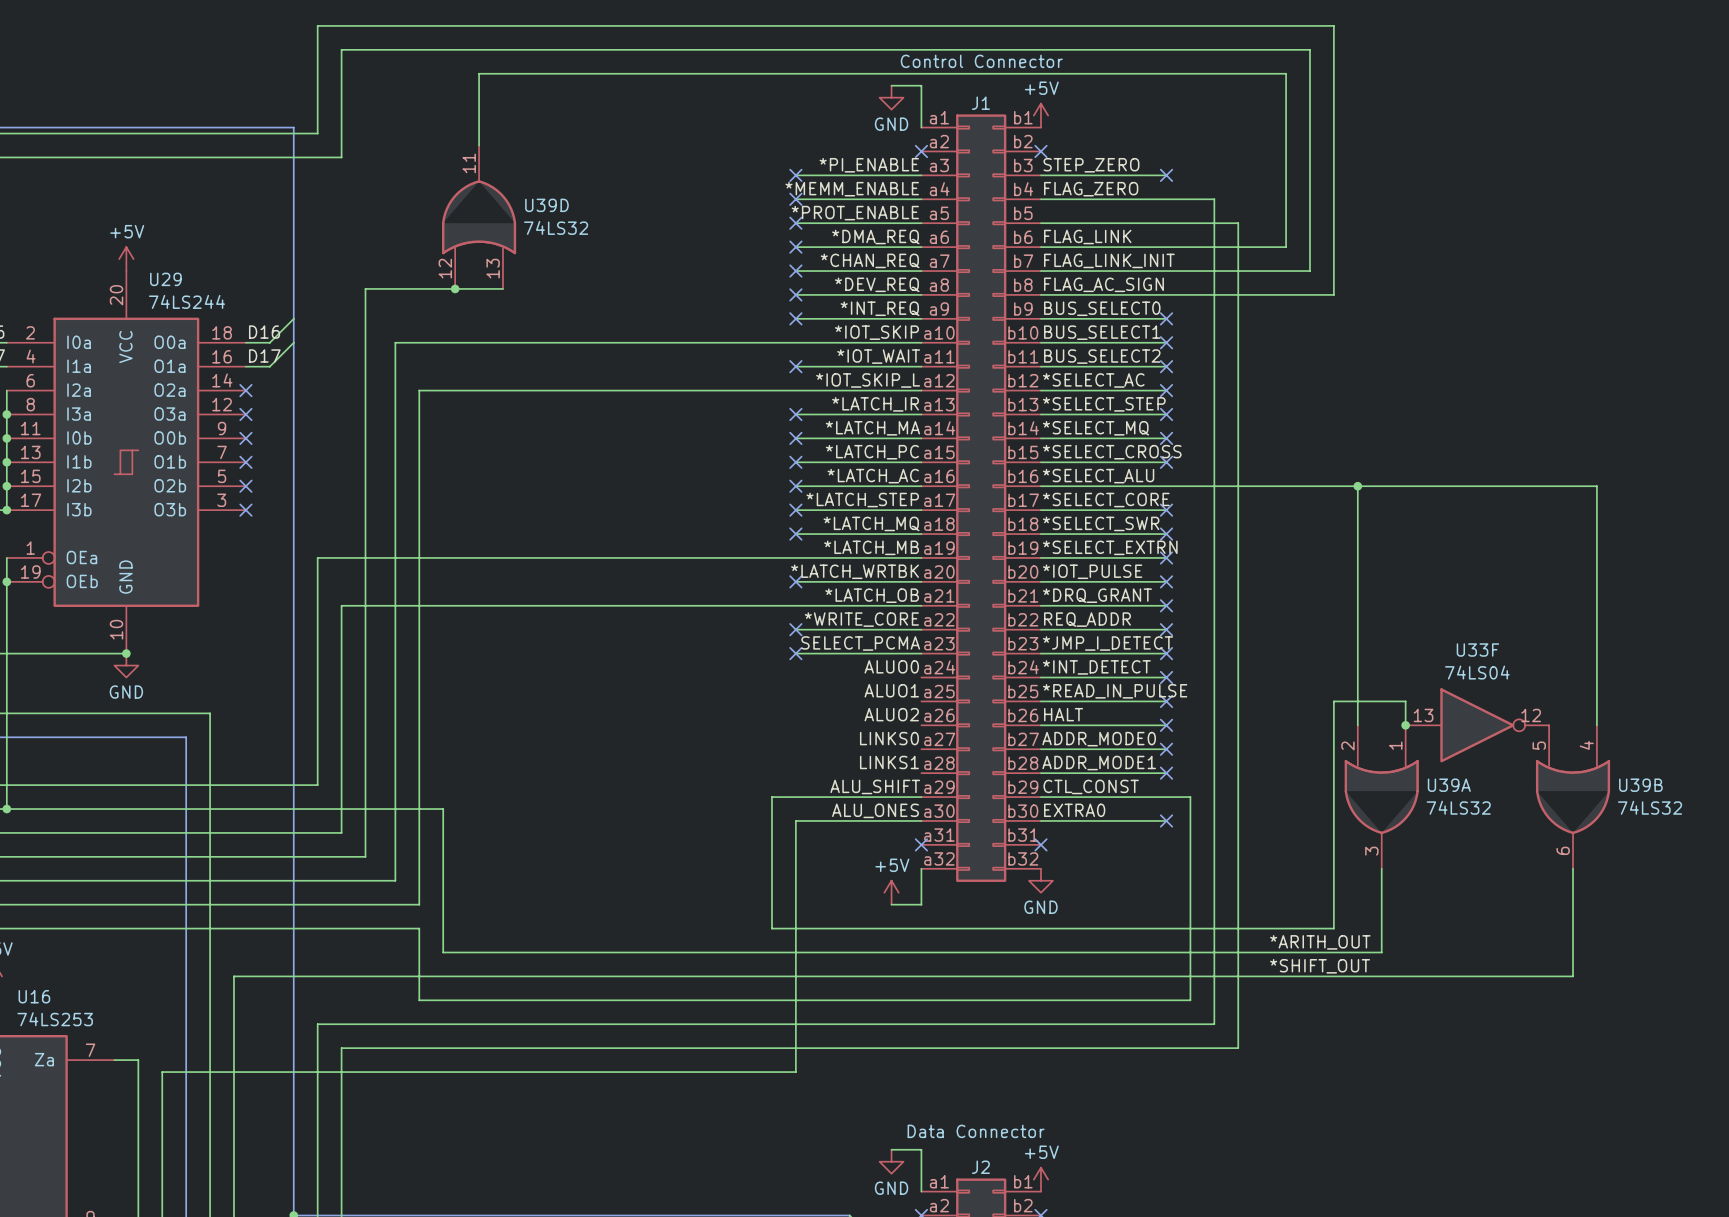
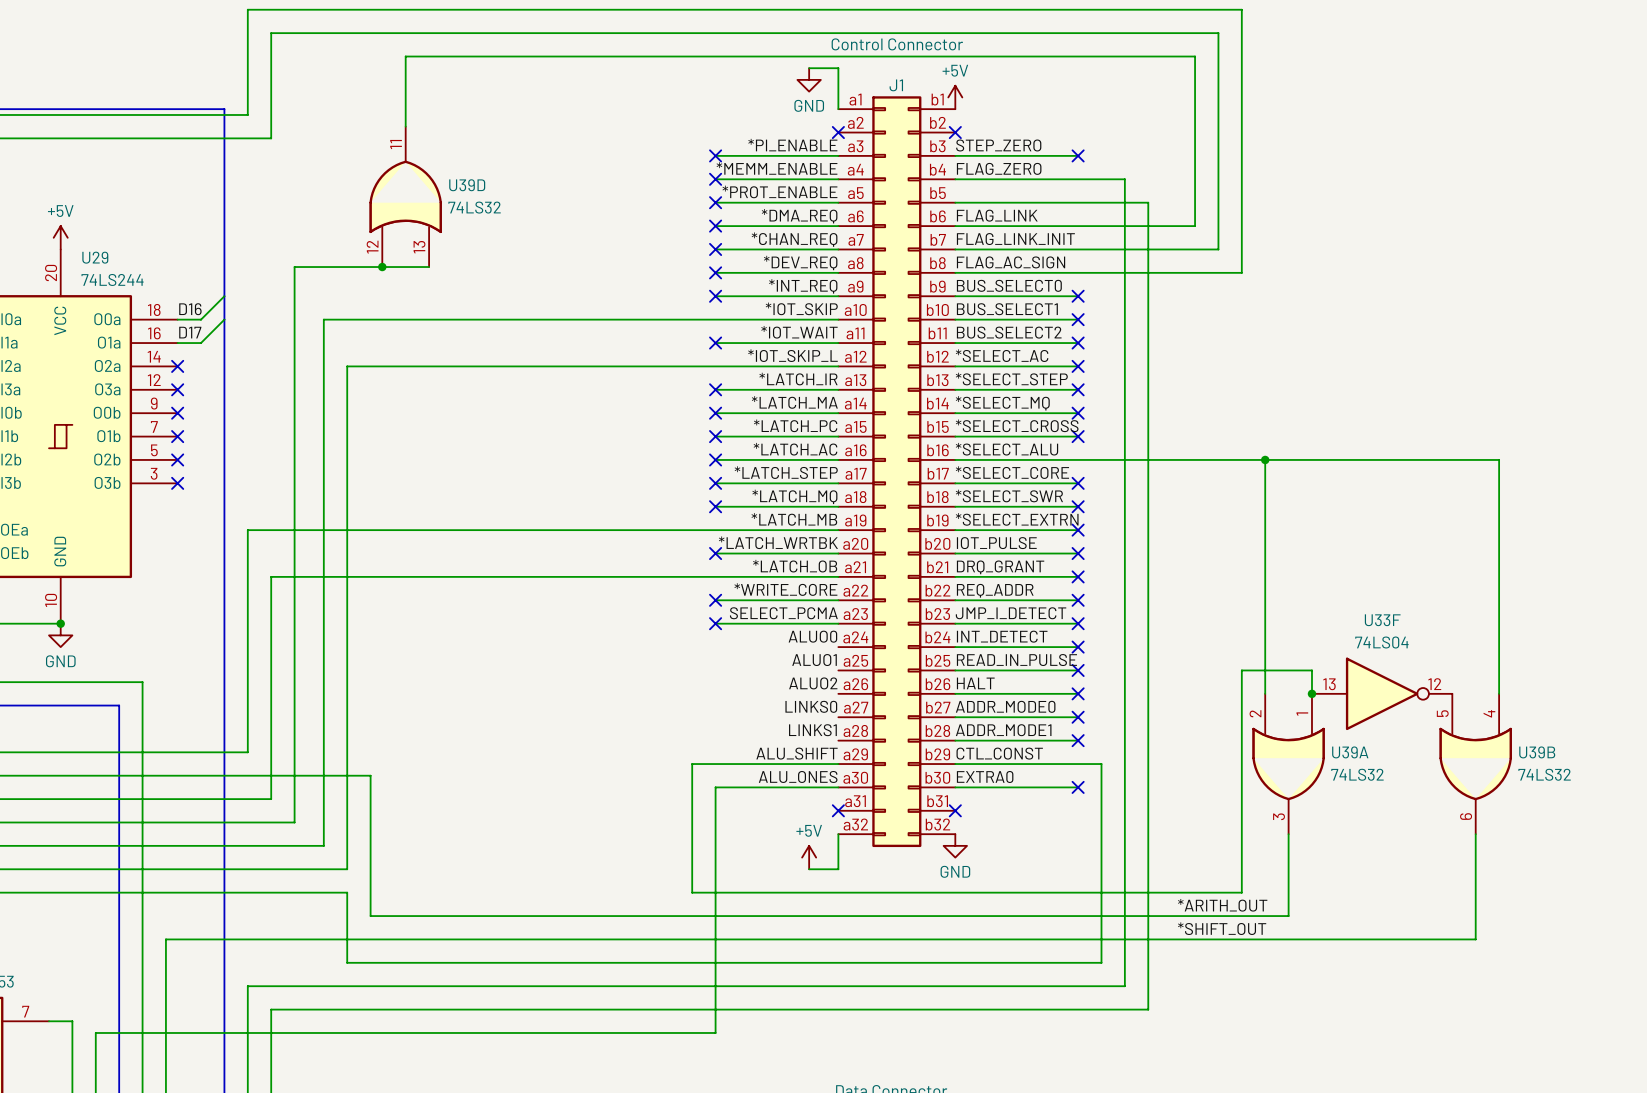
label: *IOT_PULSE (1092, 571) -> IOT_PULSE (996, 543)
label: *DRQ_GRANT (1097, 595) -> DRQ_GRANT (1000, 567)
label: *JMP_I_DETECT (1107, 643) -> JMP_I_DETECT (1011, 613)
label: *INT_DETECT (1096, 667) -> INT_DETECT (1002, 636)
label: *READ_IN_PULSE (1115, 691) -> READ_IN_PULSE (1016, 660)

